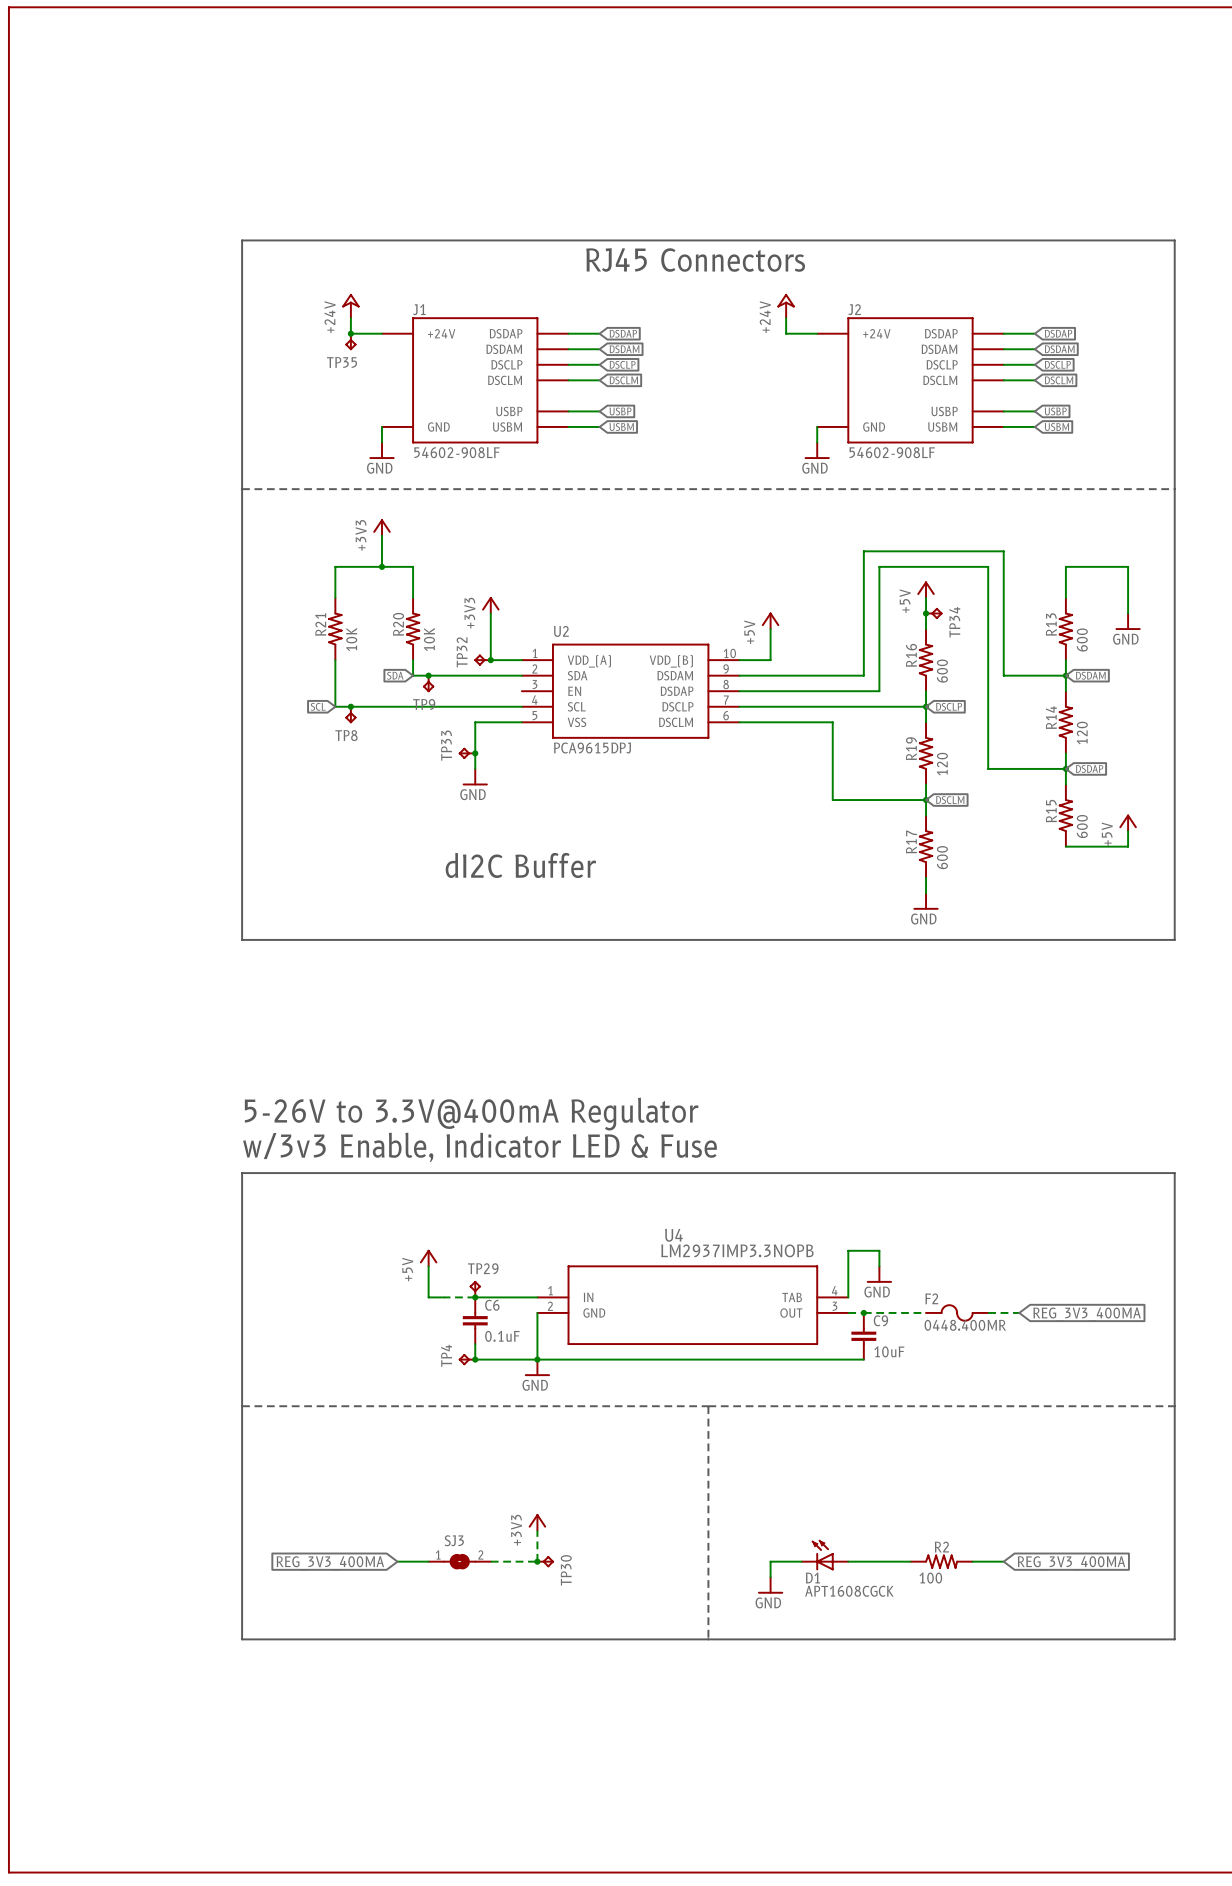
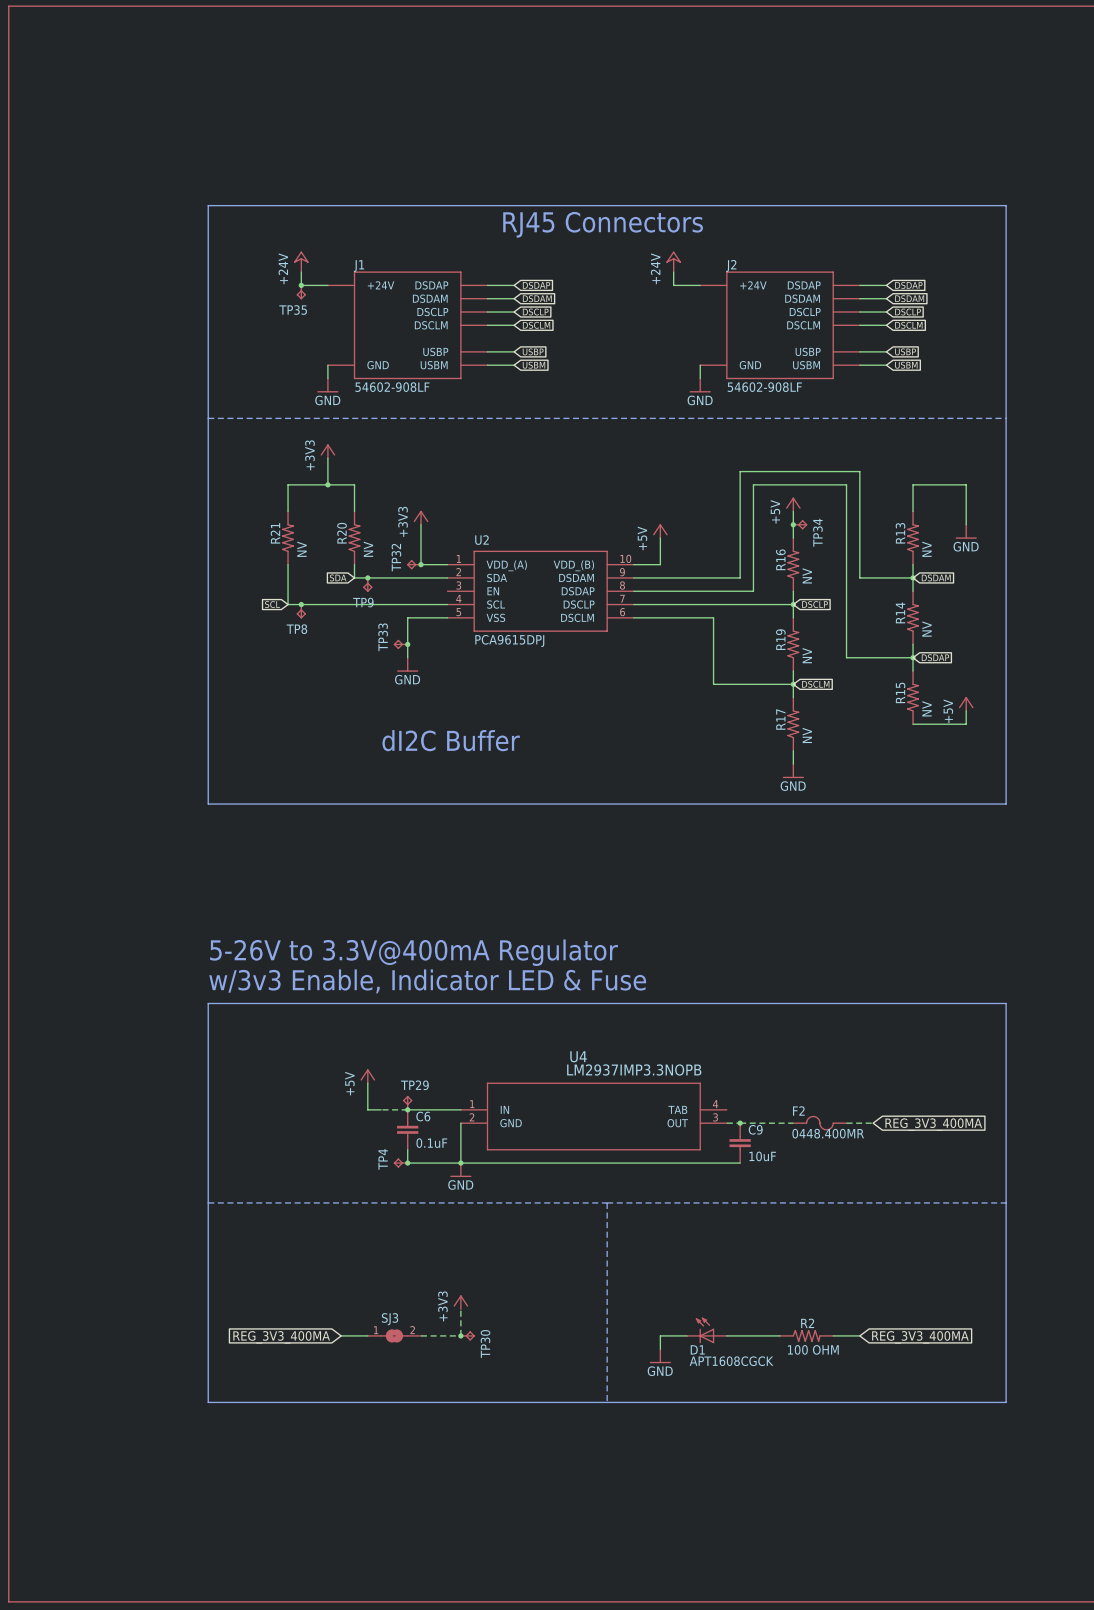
R21 value: 10K (351, 639) -> NV (301, 549)
R20 value: 10K (429, 639) -> NV (368, 549)
R13 value: 600 (1082, 640) -> NV (926, 549)
R16 value: 600 (942, 671) -> NV (807, 575)
R14 value: 120 (1082, 733) -> NV (926, 629)
R19 value: 120 (942, 764) -> NV (807, 655)
R15 value: 600 (1082, 826) -> NV (926, 708)
R17 value: 600 (942, 857) -> NV (807, 735)
wire: (879, 1266) (879, 1250) (848, 1250) (848, 1297) -> none
power symbol: GND (879, 1274) -> none
R2 value: 100 (930, 1578) -> 100 OHM (813, 1349)

